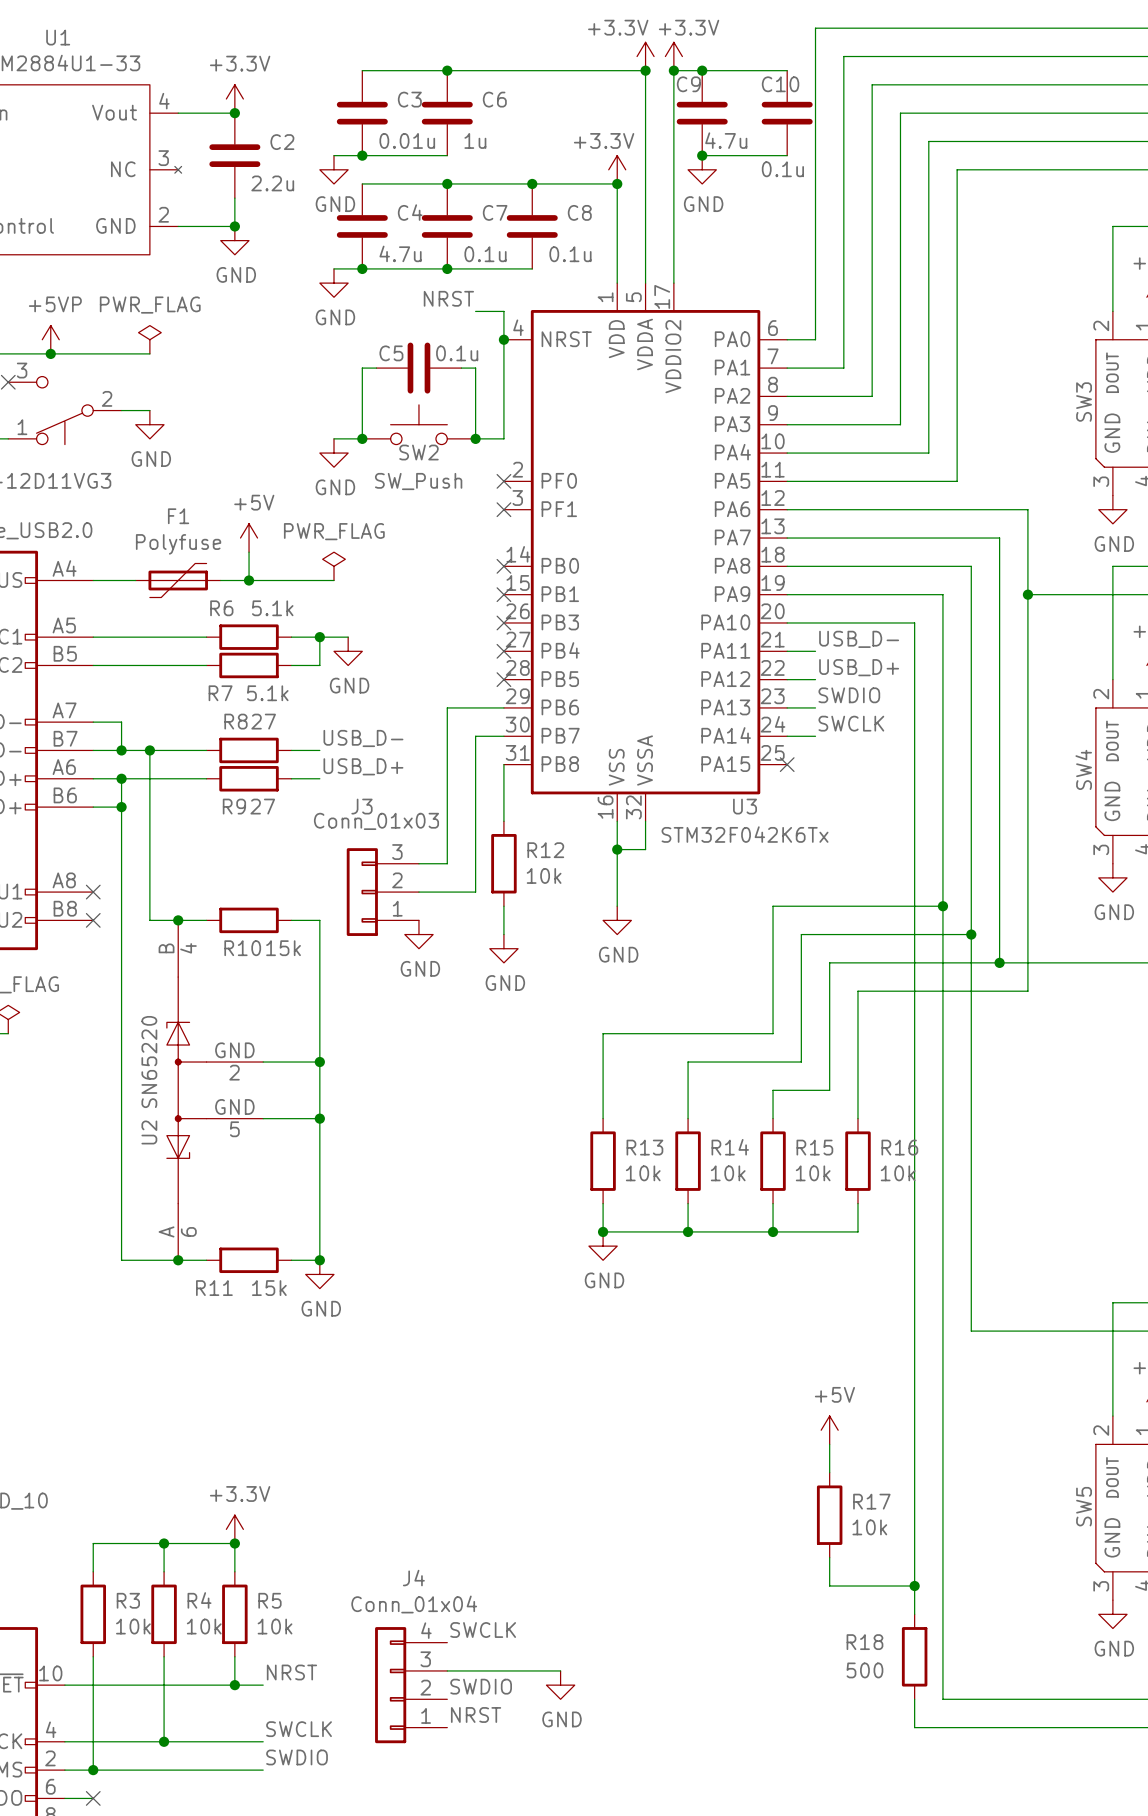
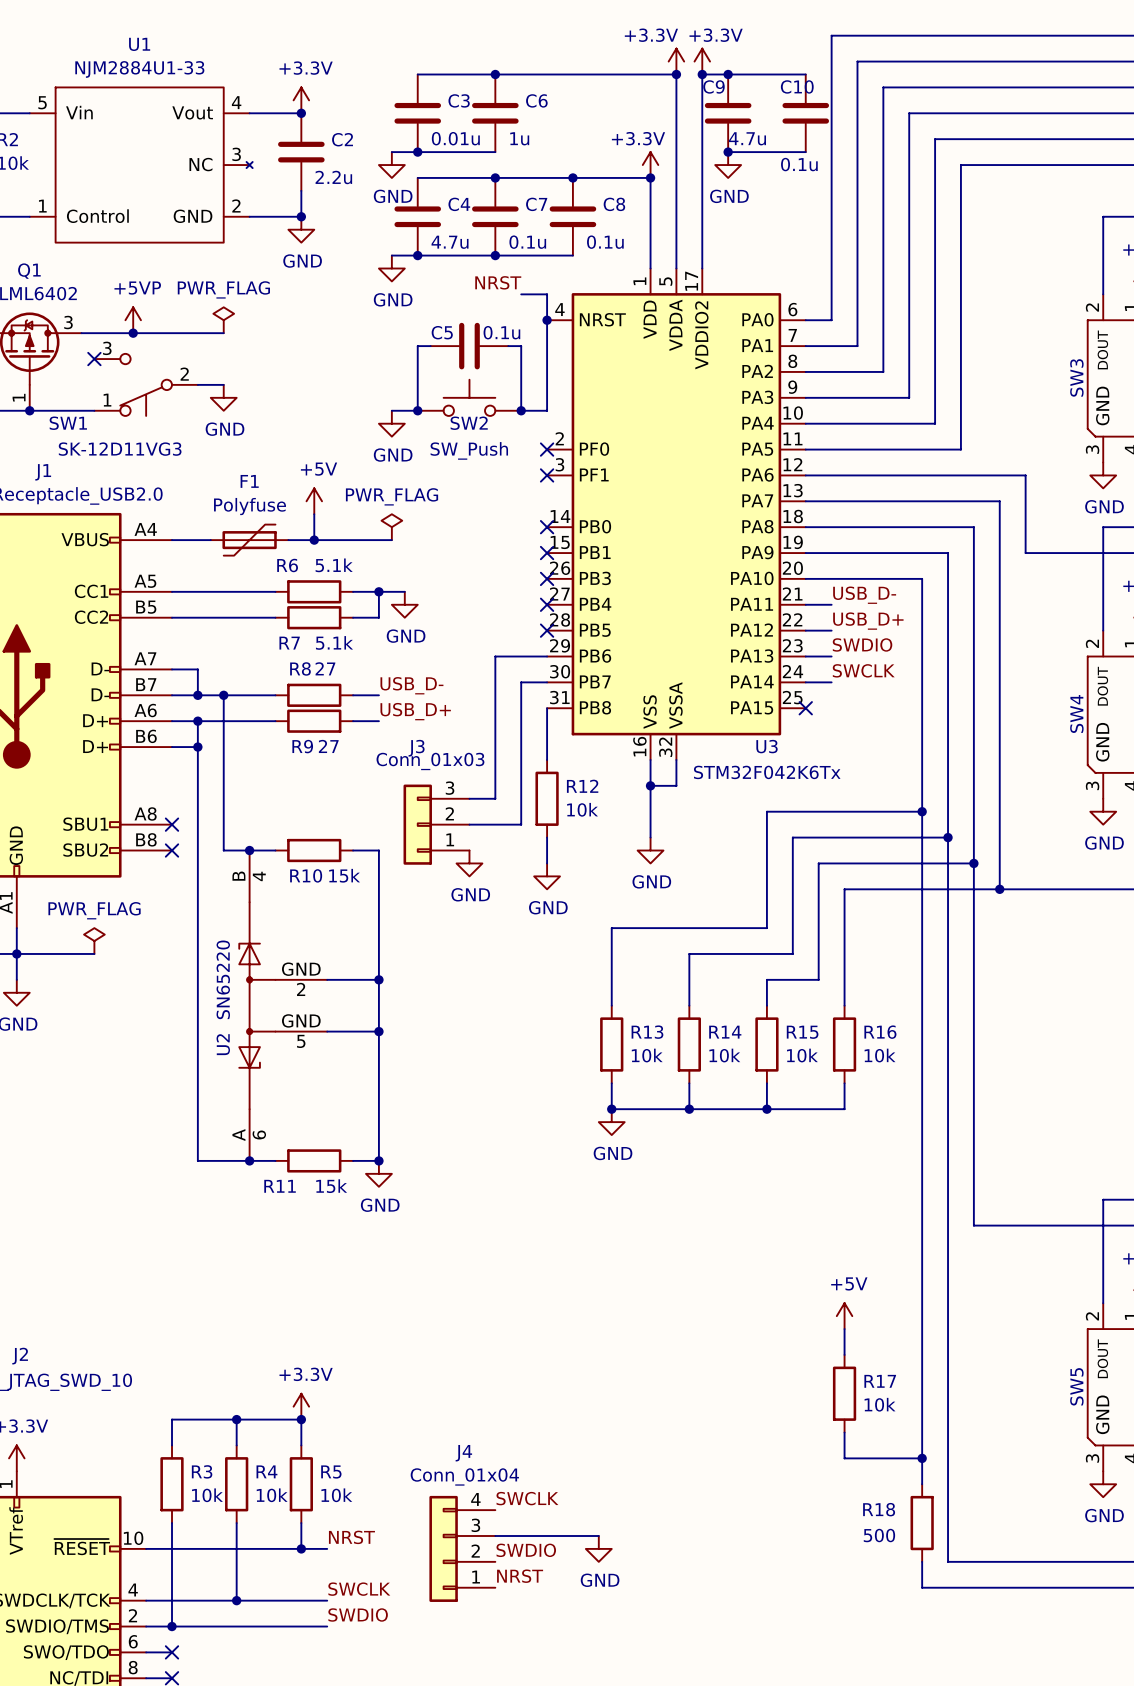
wire: (1027, 594) (1027, 991) (857, 991) (857, 1118) -> none
junction: (1027, 594) -> none
wire: none -> (922, 811) (766, 811) (766, 928) (611, 928) (611, 1005)
junction: none -> (922, 811)
wire: (659, 1033) (603, 1033) (603, 1118) -> (689, 953) (689, 1005)
wire: (744, 1062) (688, 1062) (688, 1118) -> (766, 979) (766, 1005)
wire: (829, 1090) (773, 1090) (773, 1118) -> none
R13 position: (603, 1161) -> (611, 1044)
R14 position: (688, 1161) -> (689, 1044)
R15 position: (773, 1161) -> (766, 1044)
R16 position: (857, 1161) -> (844, 1044)
junction: none -> (611, 1109)
wire: (603, 1203) (603, 1231) (857, 1231) (857, 1203) -> (611, 1083) (611, 1109) (844, 1109) (844, 1083)
junction: none -> (689, 1109)
wire: (688, 1203) (688, 1231) -> (689, 1083) (689, 1109)
junction: none -> (766, 1109)
wire: (773, 1203) (773, 1231) -> (766, 1083) (766, 1109)
junction: (603, 1231) -> none
junction: (688, 1231) -> none
junction: (773, 1231) -> none
power symbol position: GND (603, 1246) -> GND (611, 1122)

